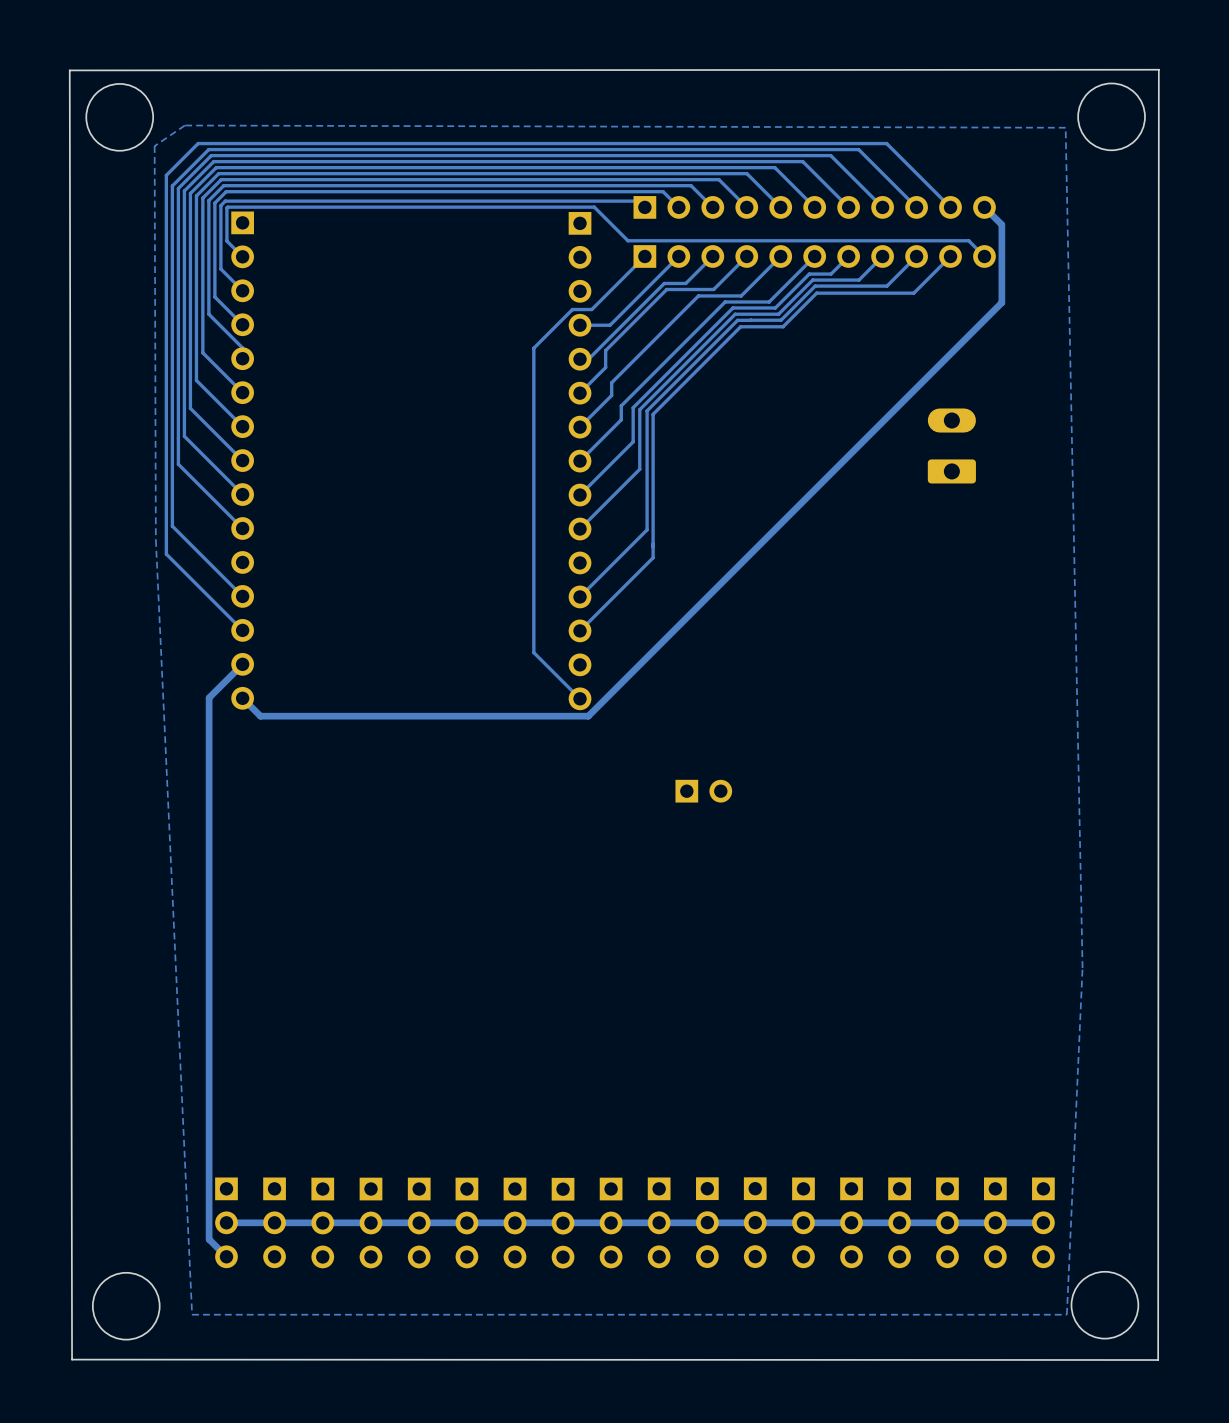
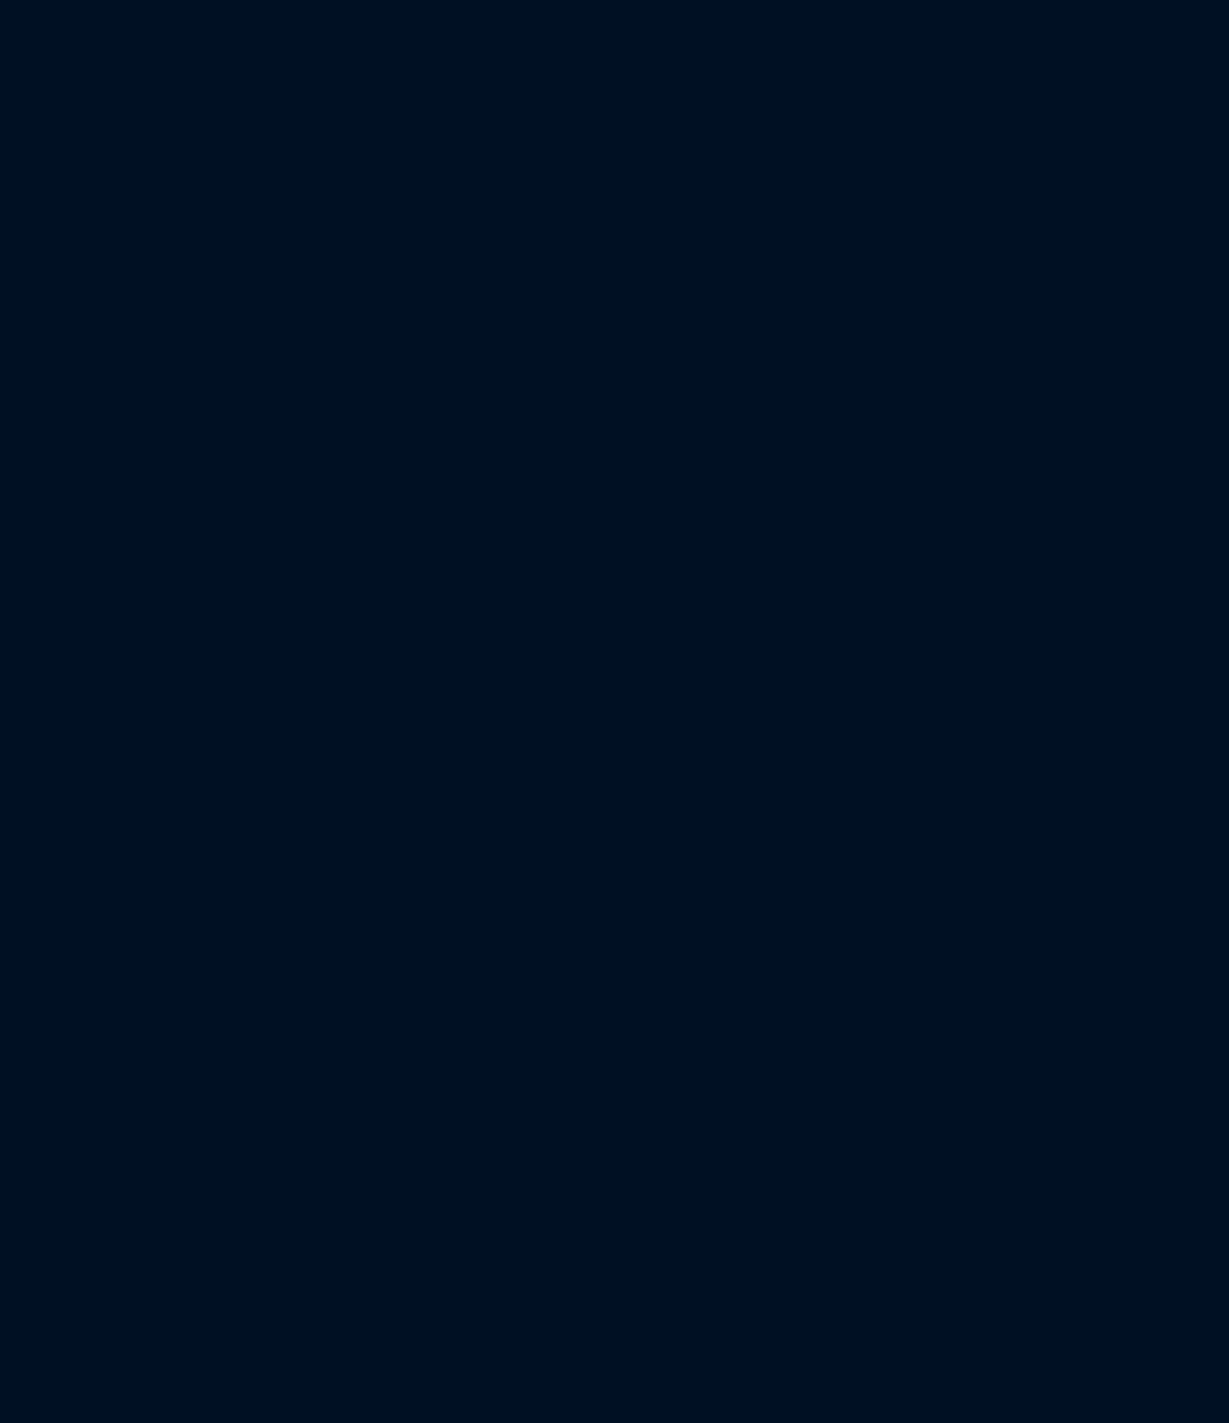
board edge: (1158, 69) (69, 70) (72, 1359) (1158, 1360) (1158, 69) -> none
round board edge: [85, 83, 154, 152] -> none
round board edge: [1077, 83, 1146, 151] -> none
zone outline: (184, 125) (1065, 127) (1082, 967) (1066, 1314) (192, 1314) (155, 539) (154, 146) (184, 125) -> none
track: (644, 207) (638, 201) (225, 201) (220, 205) (220, 269) (242, 290) -> none
track: (678, 207) (663, 191) (226, 191) (214, 203) (214, 297) (242, 324) -> none
track: (712, 207) (691, 185) (223, 185) (208, 200) (208, 314) (242, 347) (242, 358) -> none
track: (746, 207) (719, 179) (221, 179) (202, 198) (202, 352) (242, 392) -> none
track: (780, 207) (746, 173) (218, 173) (196, 195) (196, 380) (242, 426) -> none
track: (814, 207) (774, 167) (216, 167) (190, 193) (190, 408) (242, 460) -> none
part: (814, 207) -> none
track: (848, 207) (802, 161) (213, 161) (184, 190) (184, 436) (242, 494) -> none
track: (882, 207) (830, 155) (211, 155) (178, 188) (178, 464) (242, 528) -> none
track: (916, 207) (858, 149) (208, 149) (172, 185) (172, 526) (242, 596) -> none
track: (950, 207) (886, 143) (198, 143) (166, 175) (166, 554) (242, 630) -> none
track: (984, 207) (1001, 224) (1001, 302) (588, 716) (260, 716) (242, 698) -> none
track: (644, 256) (591, 309) (572, 309) (533, 348) (533, 652) (580, 698) -> none
track: (678, 256) (610, 325) (580, 325) -> none
track: (712, 256) (685, 283) (664, 283) (588, 359) (580, 359) -> none
track: (746, 256) (713, 289) (666, 289) (605, 350) (605, 367) (580, 393) -> none
track: (780, 256) (741, 295) (698, 295) (611, 382) (611, 395) (580, 427) -> none
track: (814, 256) (769, 301) (725, 301) (621, 405) (621, 419) (580, 461) -> none
part: (814, 256) -> none
track: (848, 256) (831, 274) (809, 274) (775, 308) (732, 308) (633, 407) (633, 441) (580, 495) -> none
track: (882, 256) (859, 280) (812, 280) (778, 314) (735, 314) (639, 409) (639, 469) (580, 529) -> none
track: (916, 256) (886, 286) (815, 286) (781, 320) (737, 320) (647, 410) (647, 529) (580, 596) -> none
track: (950, 256) (913, 293) (816, 293) (783, 326) (740, 326) (653, 414) (653, 557) (580, 630) -> none
track: (984, 256) (968, 240) (627, 240) (594, 207) (227, 207) (226, 241) (242, 256) -> none
part: (951, 445) -> none
part: (242, 460) -> none
part: (580, 461) -> none
track: (242, 664) (209, 697) (209, 1239) (226, 1256) -> none
part: (703, 791) -> none
part: (226, 1222) -> none
part: (274, 1222) -> none
part: (322, 1222) -> none
part: (370, 1222) -> none
part: (419, 1222) -> none
part: (466, 1222) -> none
part: (514, 1222) -> none
part: (611, 1222) -> none
part: (659, 1222) -> none
part: (707, 1222) -> none
part: (755, 1222) -> none
part: (803, 1222) -> none
part: (851, 1222) -> none
part: (899, 1222) -> none
part: (947, 1222) -> none
part: (995, 1222) -> none
track: (1043, 1222) (226, 1222) -> none
part: (1043, 1222) -> none
part: (563, 1223) -> none
round board edge: [1071, 1271, 1139, 1339] -> none
round board edge: [92, 1272, 161, 1340] -> none

